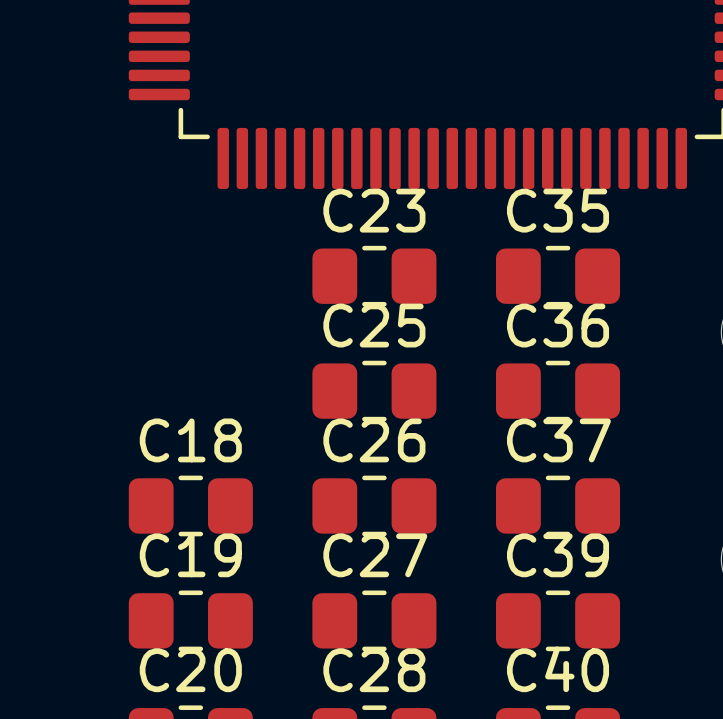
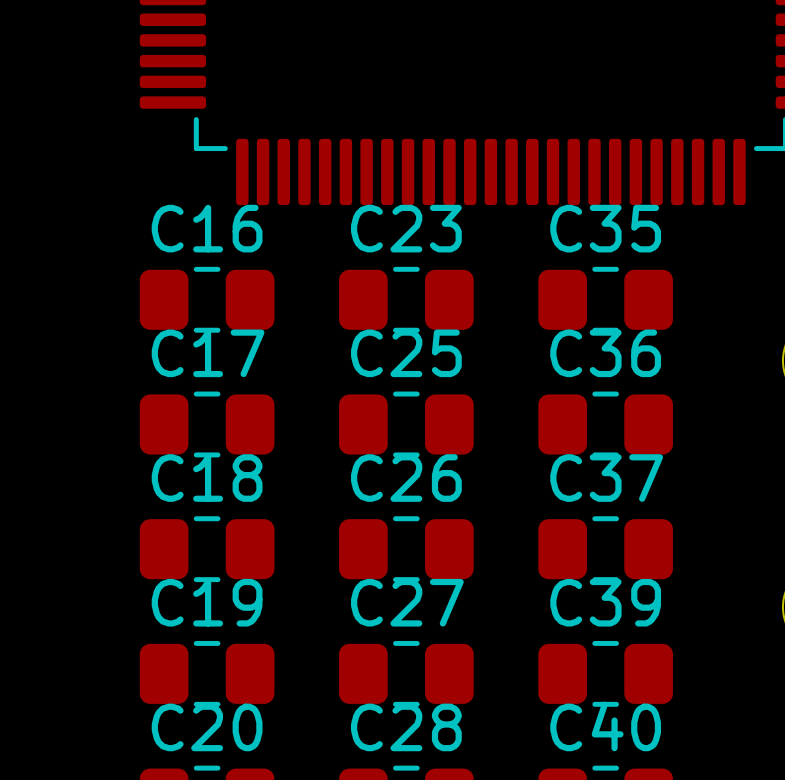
C16: none -> (207, 299)
C17: none -> (207, 424)

